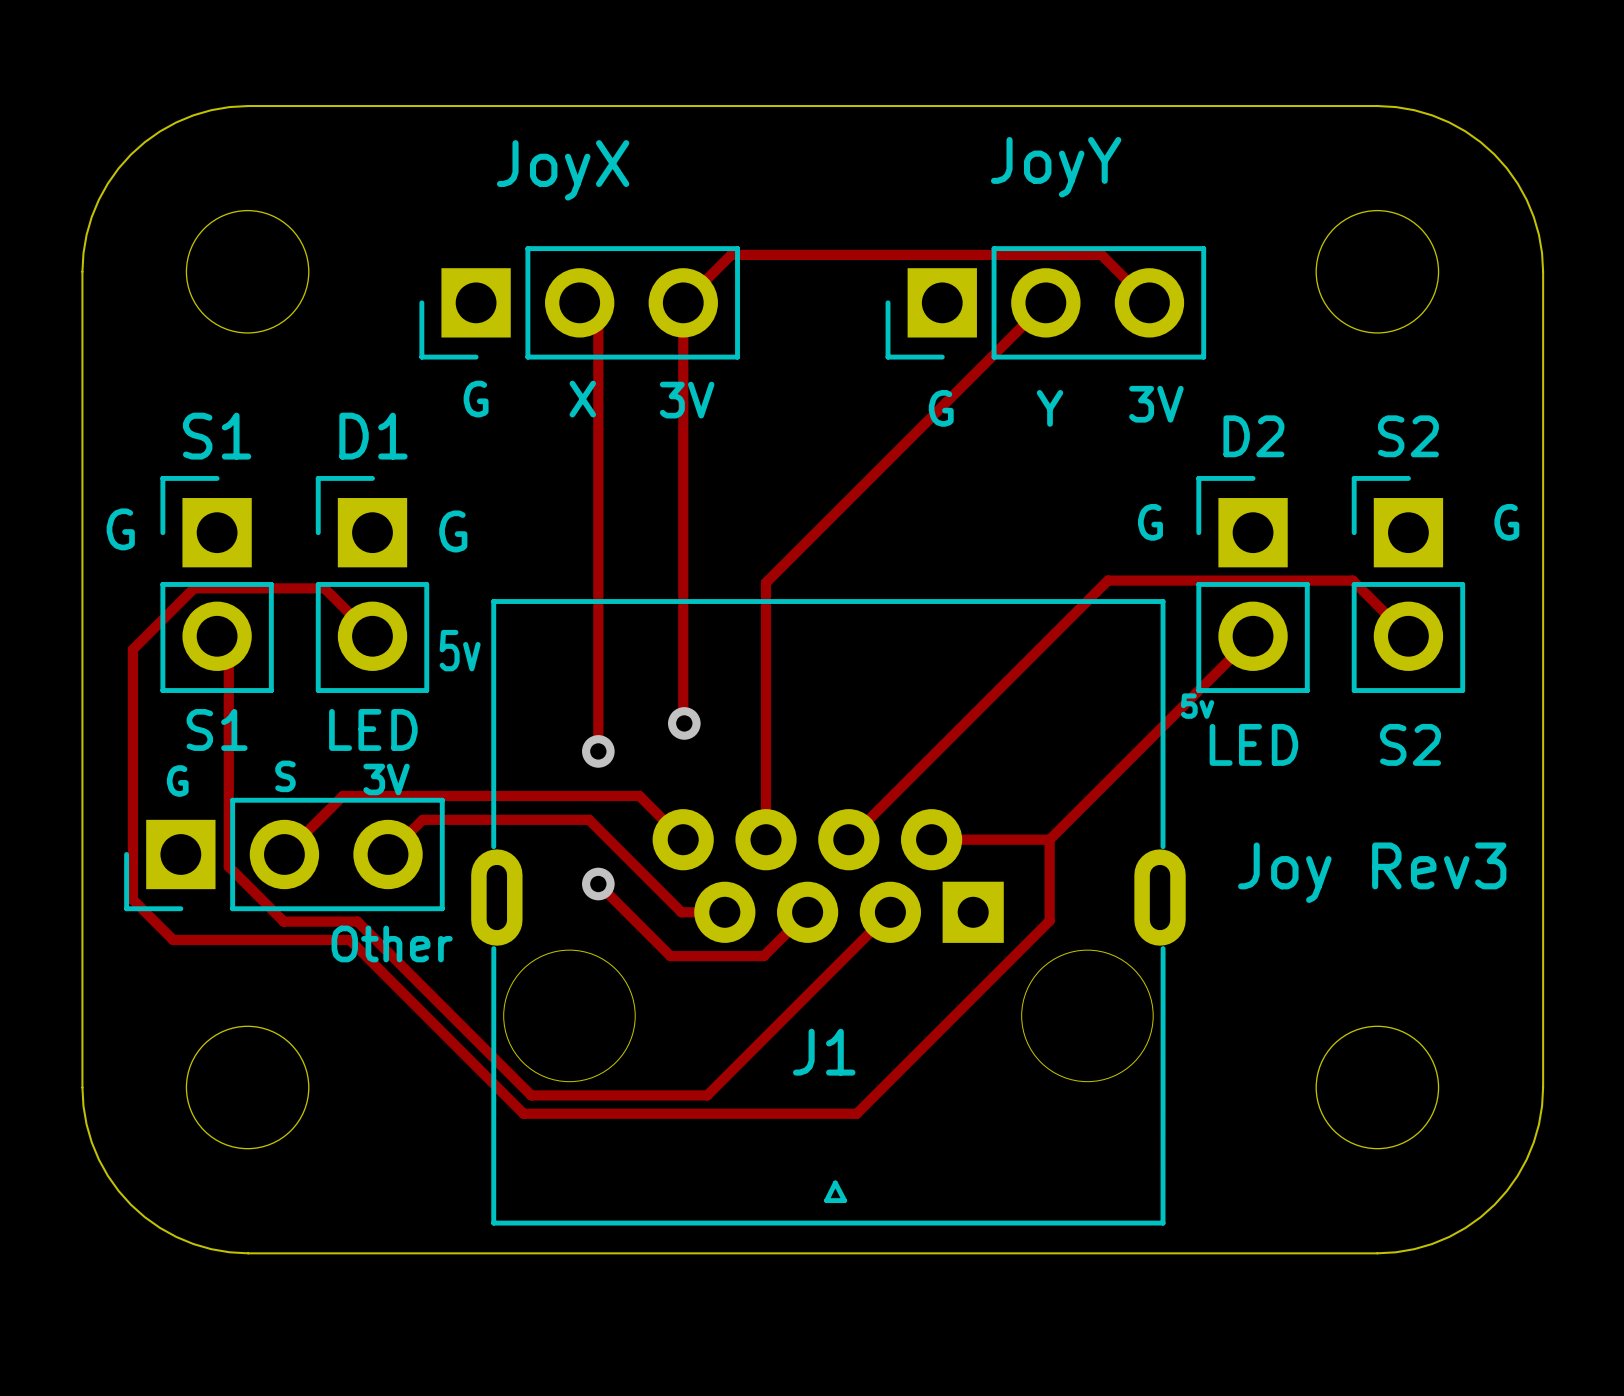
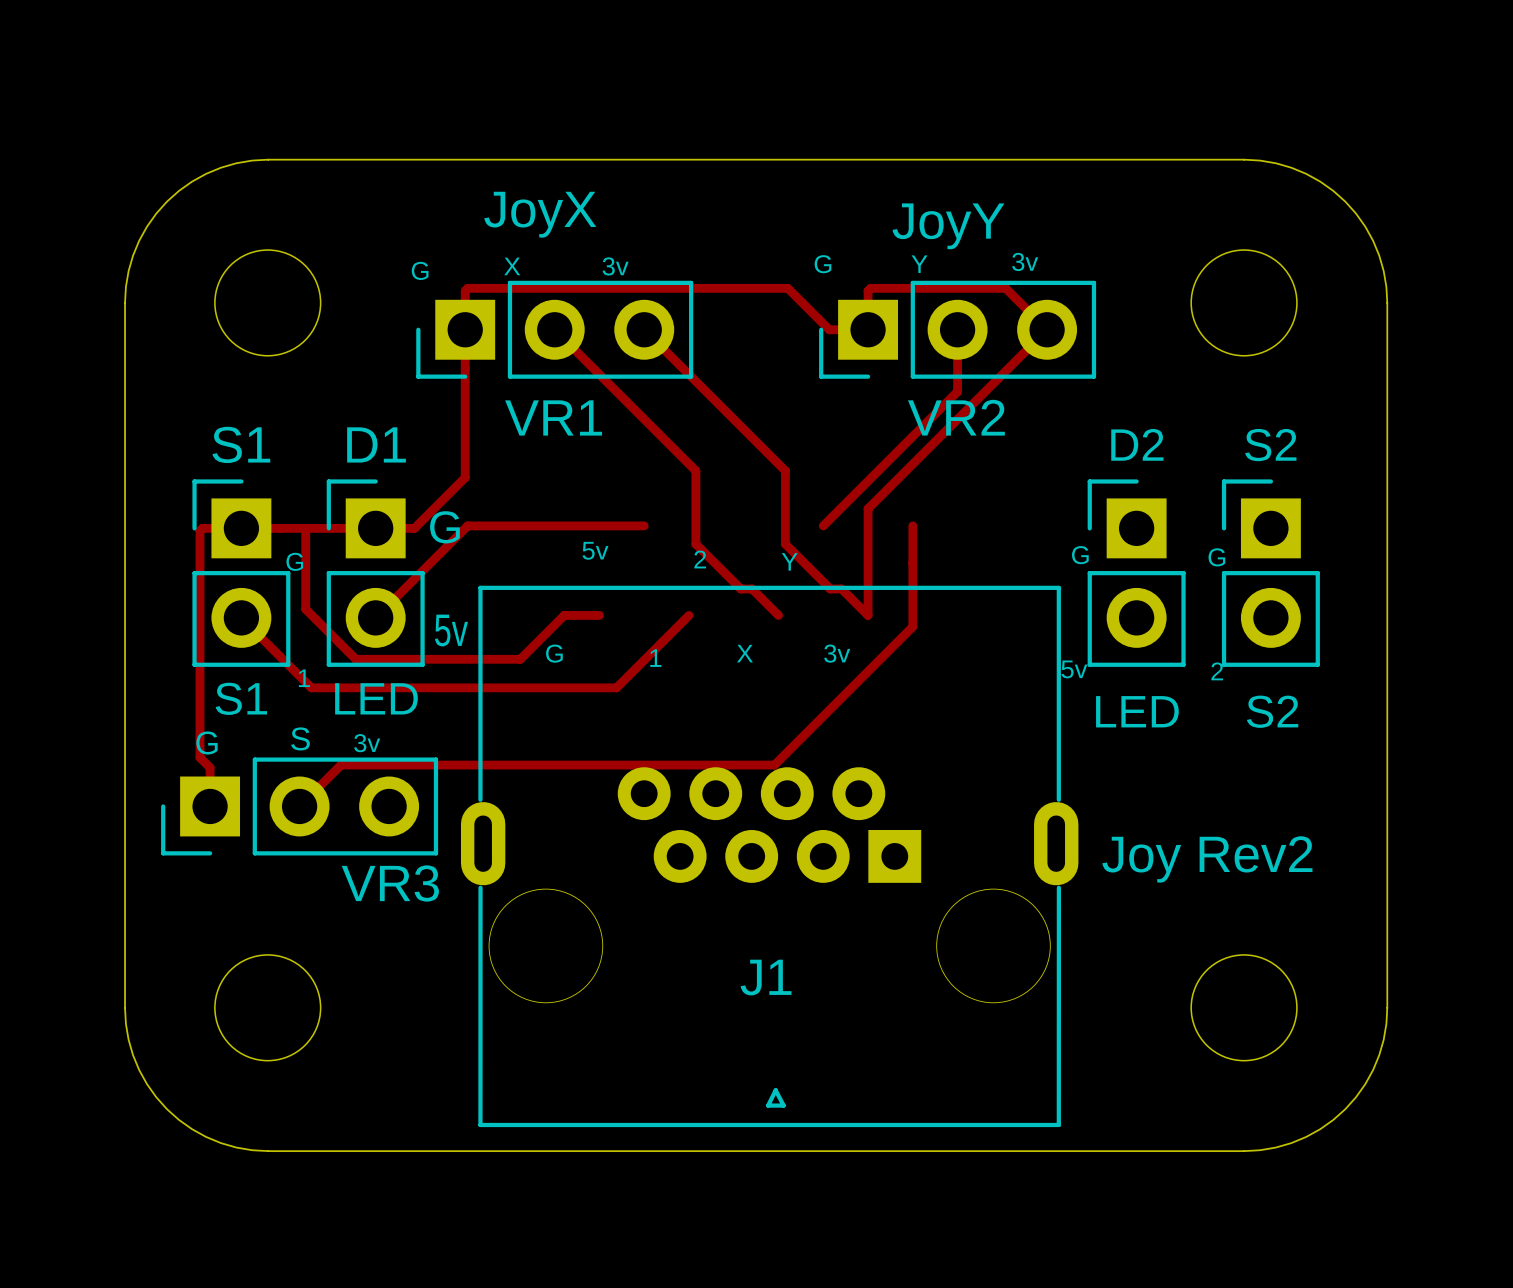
VR2 value position: JoyY (1056, 167) -> JoyY (948, 226)
text: none -> 3v (1025, 261)
text: none -> G (822, 264)
text: none -> Y (919, 264)
text: none -> X (512, 266)
text: none -> 3v (615, 266)
text: none -> G (420, 270)
track: (731, 254) (683, 302) (684, 723) -> (685, 288) (467, 288) (465, 290) (465, 477) (414, 528) (202, 528) (199, 531) (199, 757) (210, 767) (210, 806)
track: (849, 254) (945, 254) -> (787, 288) (829, 329) (868, 329) (868, 290) (870, 288)
track: none -> (644, 329) (785, 470) (785, 544) (830, 588) (841, 588) (868, 615) (868, 508) (1047, 329)
track: (1045, 302) (766, 582) (766, 839) -> (957, 329) (957, 391) (823, 525)
track: (598, 321) (598, 751) -> (570, 345) (695, 470) (695, 544) (740, 588) (752, 588) (778, 615)
text: G (476, 399) -> none
text: X (582, 399) -> none
text: 3V (687, 400) -> none
VR1 name: none -> VR1 (553, 417)
VR2 name: none -> VR2 (956, 417)
text: 3V (1156, 404) -> none
text: G (941, 408) -> none
text: Y (1050, 408) -> none
text position: G (1150, 522) -> G (1080, 555)
text: G (1506, 522) -> none
text: G (120, 529) -> none
track: none -> (305, 528) (305, 609) (355, 659) (520, 659) (564, 615) (599, 615)
text: none -> 5v (595, 550)
text: none -> G (1216, 557)
text: none -> 2 (700, 559)
text: none -> G (294, 561)
text: none -> Y (789, 561)
track: (372, 636) (324, 588) (194, 588) (132, 649) (132, 899) (173, 939) (349, 939) (523, 1113) (856, 1113) (1049, 920) (1049, 839) -> (375, 617) (467, 525) (644, 525)
track: (1253, 636) (1049, 839) -> none
track: (1408, 636) (1352, 580) (1107, 580) (848, 839) -> none
track: (228, 647) (228, 866) (283, 921) (357, 921) (531, 1095) (707, 1095) (890, 912) -> (251, 627) (311, 687) (616, 687) (689, 615)
text: none -> G (554, 653)
text: none -> X (744, 653)
text: none -> 3v (837, 653)
text: none -> 1 (655, 658)
text: none -> 2 (1217, 671)
text: none -> 1 (304, 678)
text position: 5v (1197, 706) -> 5v (1074, 669)
via: (684, 723) -> none
via: (598, 751) -> none
text: 3V (386, 779) -> 3v (367, 743)
track: (332, 806) (342, 795) (639, 795) (683, 839) -> (341, 765) (774, 765) (912, 626) (912, 525)
track: (931, 839) (1049, 839) -> none
track: (388, 854) (422, 819) (589, 819) (681, 912) (724, 912) -> none
text: Joy Rev3 (1372, 872) -> Joy Rev2 (1207, 859)
track: (598, 884) (670, 956) (763, 956) (807, 912) -> none
via: (598, 884) -> none
Other name: Other (392, 943) -> VR3 (390, 883)

